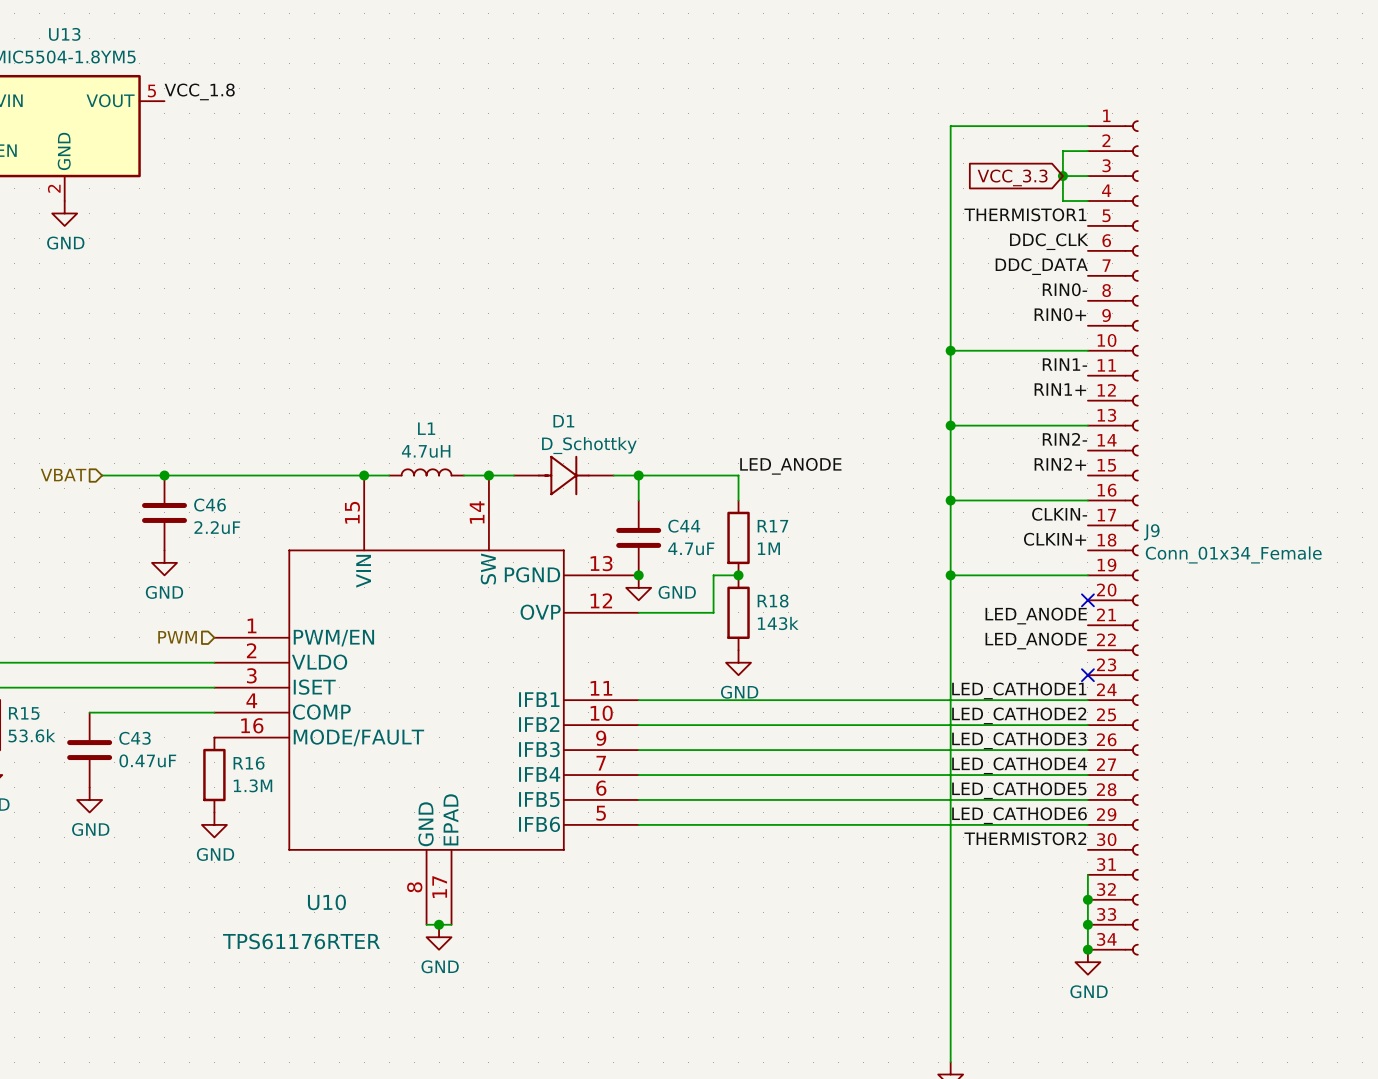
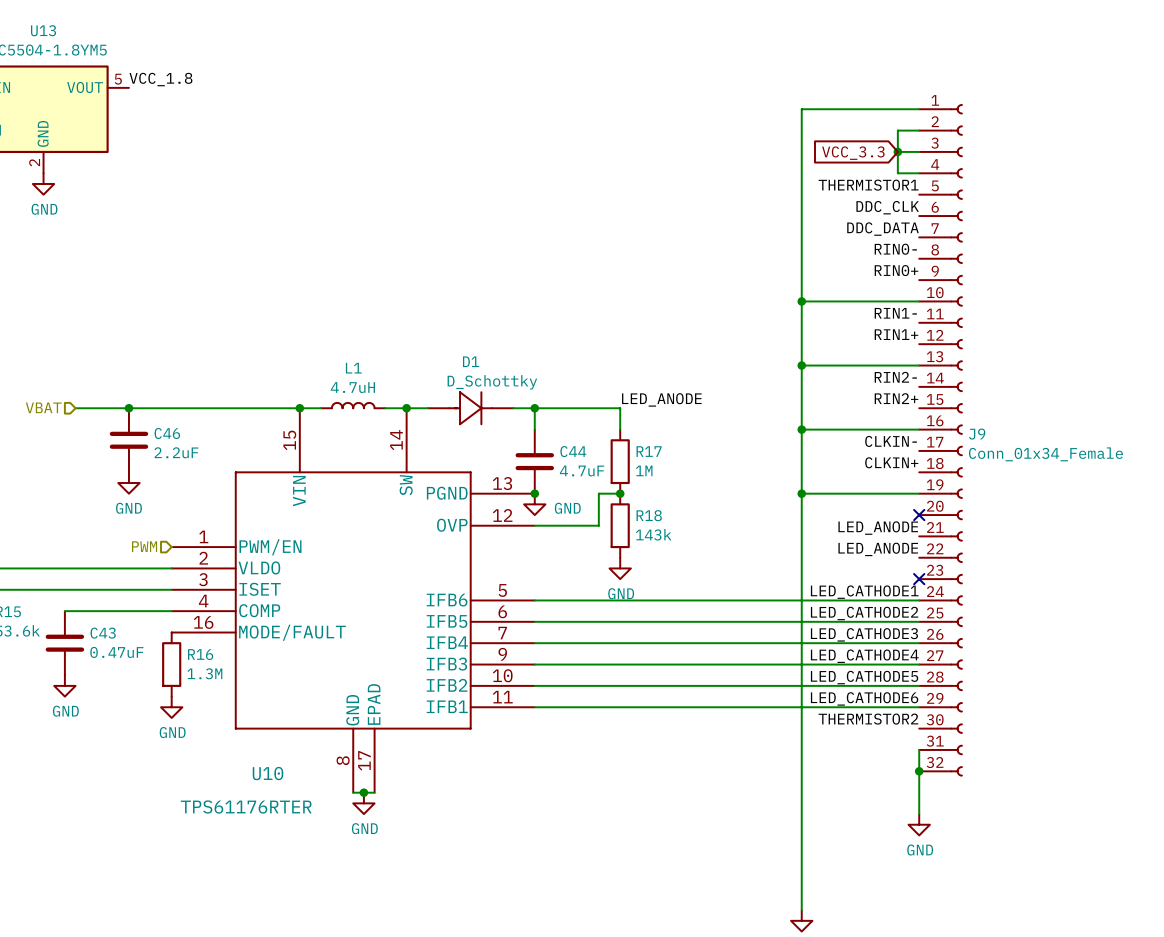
J9 symbol: [1087, 120, 1139, 956] -> [919, 104, 963, 777]
U10 symbol: [214, 475, 639, 925] -> [171, 408, 535, 793]
junction: (1087, 924) -> none
junction: (1087, 949) -> none

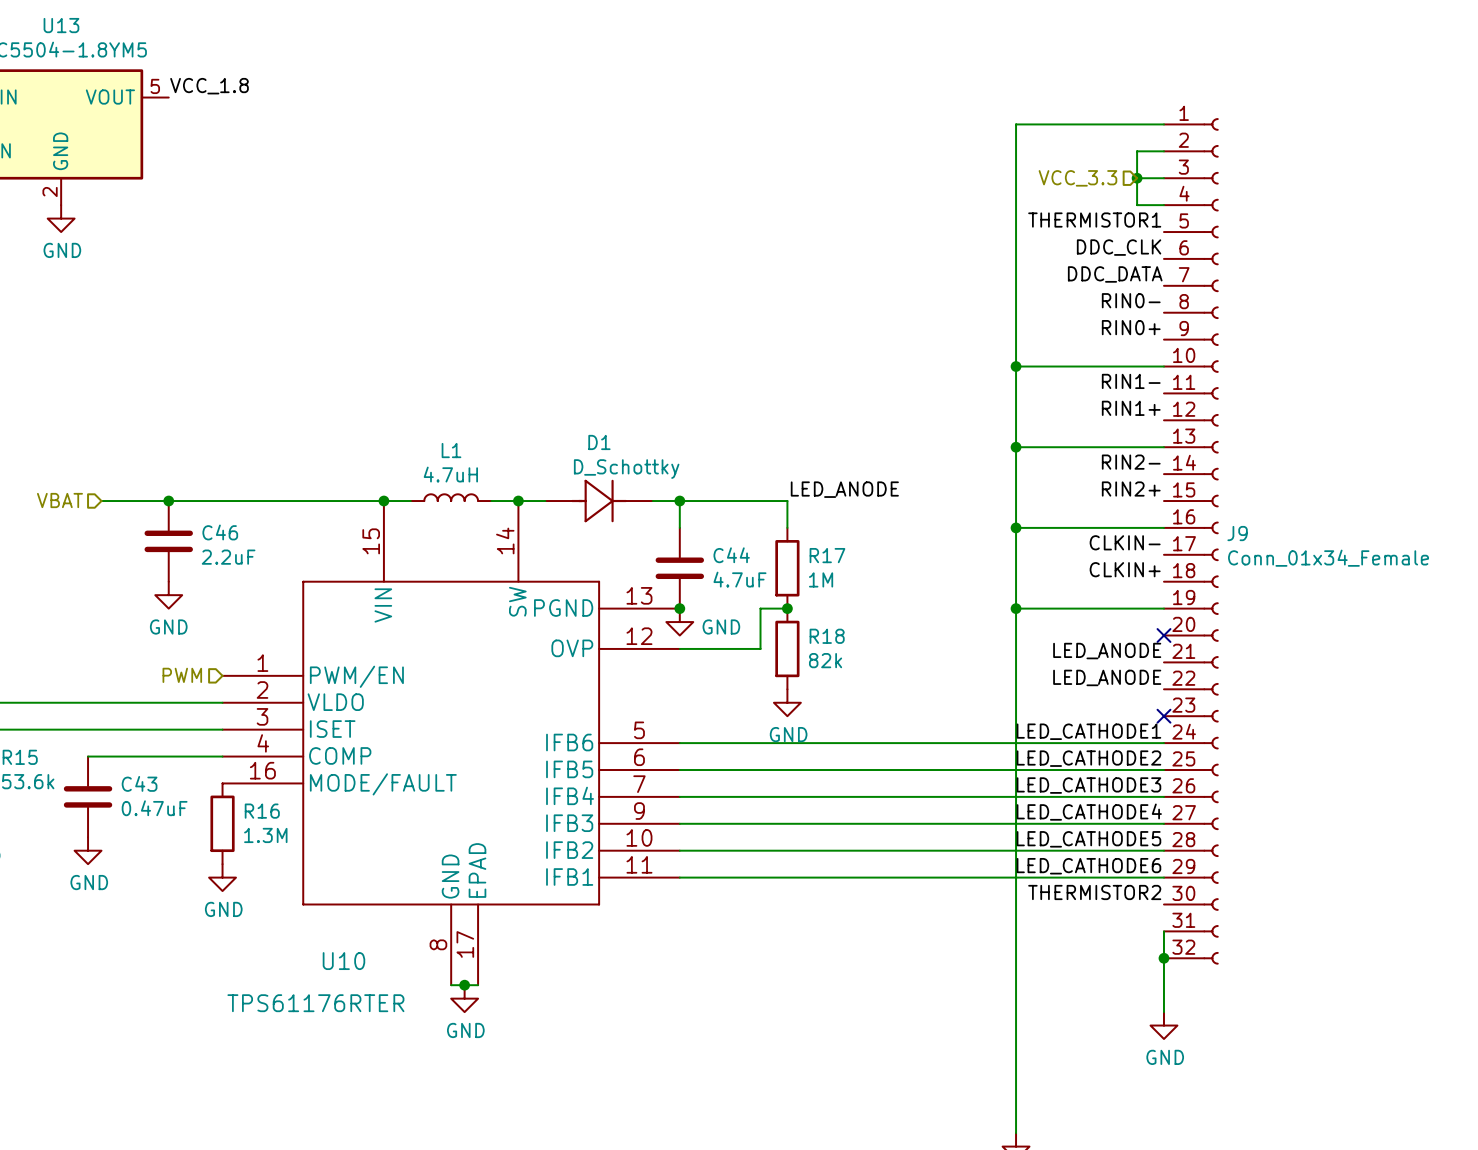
hierarchical label: none -> VCC_3.3 (1077, 178)
global label: VCC_3.3 (853, 153) -> none
R18 value: 143k (653, 534) -> 82k (825, 660)

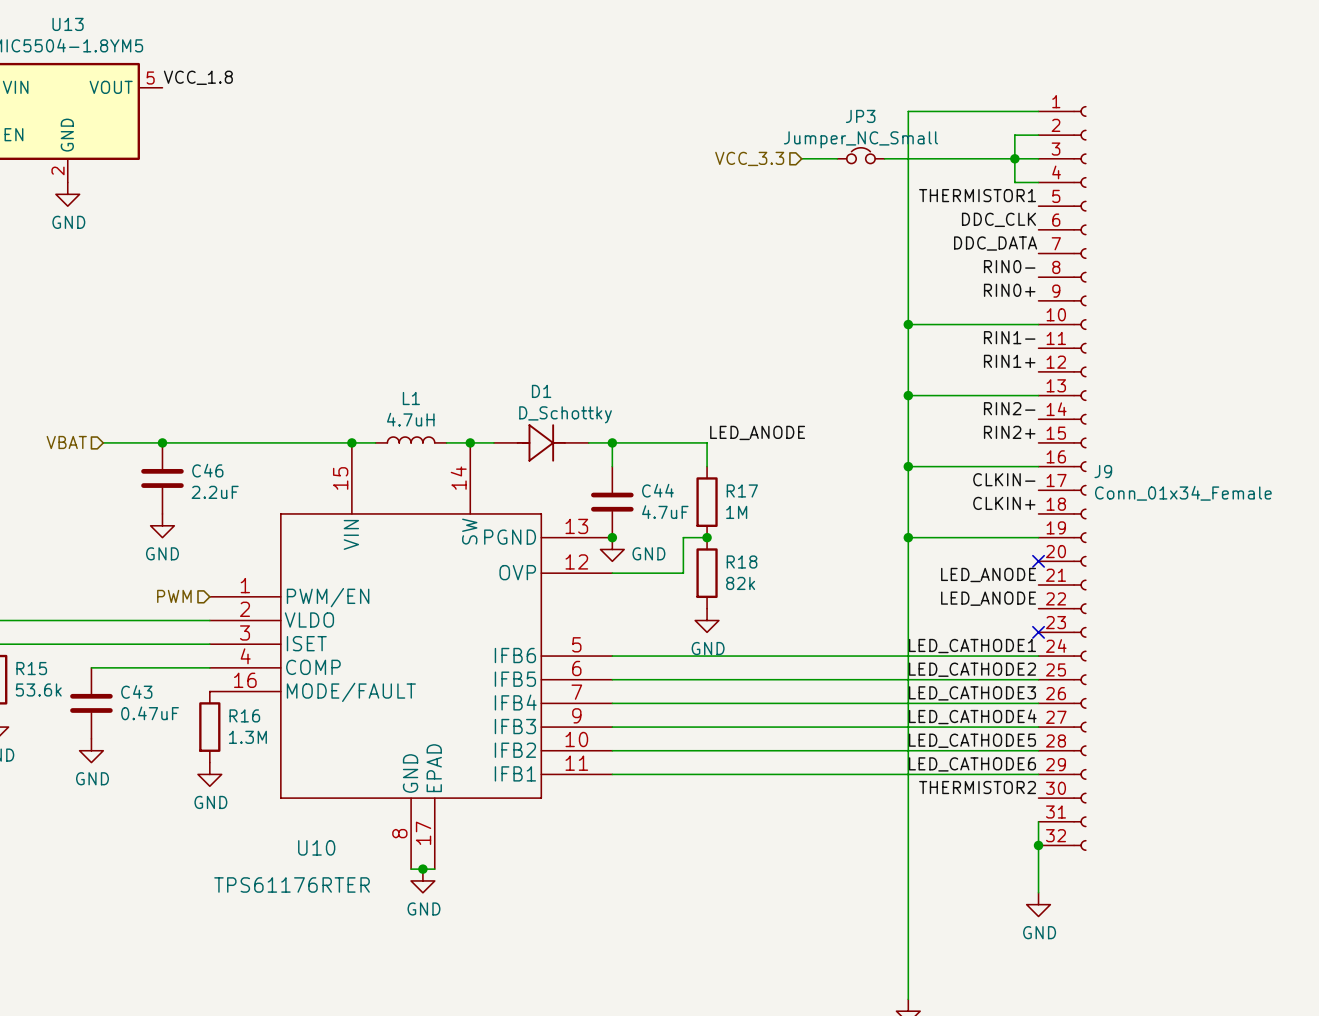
JP3: none -> Jumper_NC_Small (860, 155)
wire: none -> (801, 158) (837, 158)
wire: none -> (884, 158) (1014, 158)
hierarchical label position: VCC_3.3 (1077, 178) -> VCC_3.3 (749, 158)

